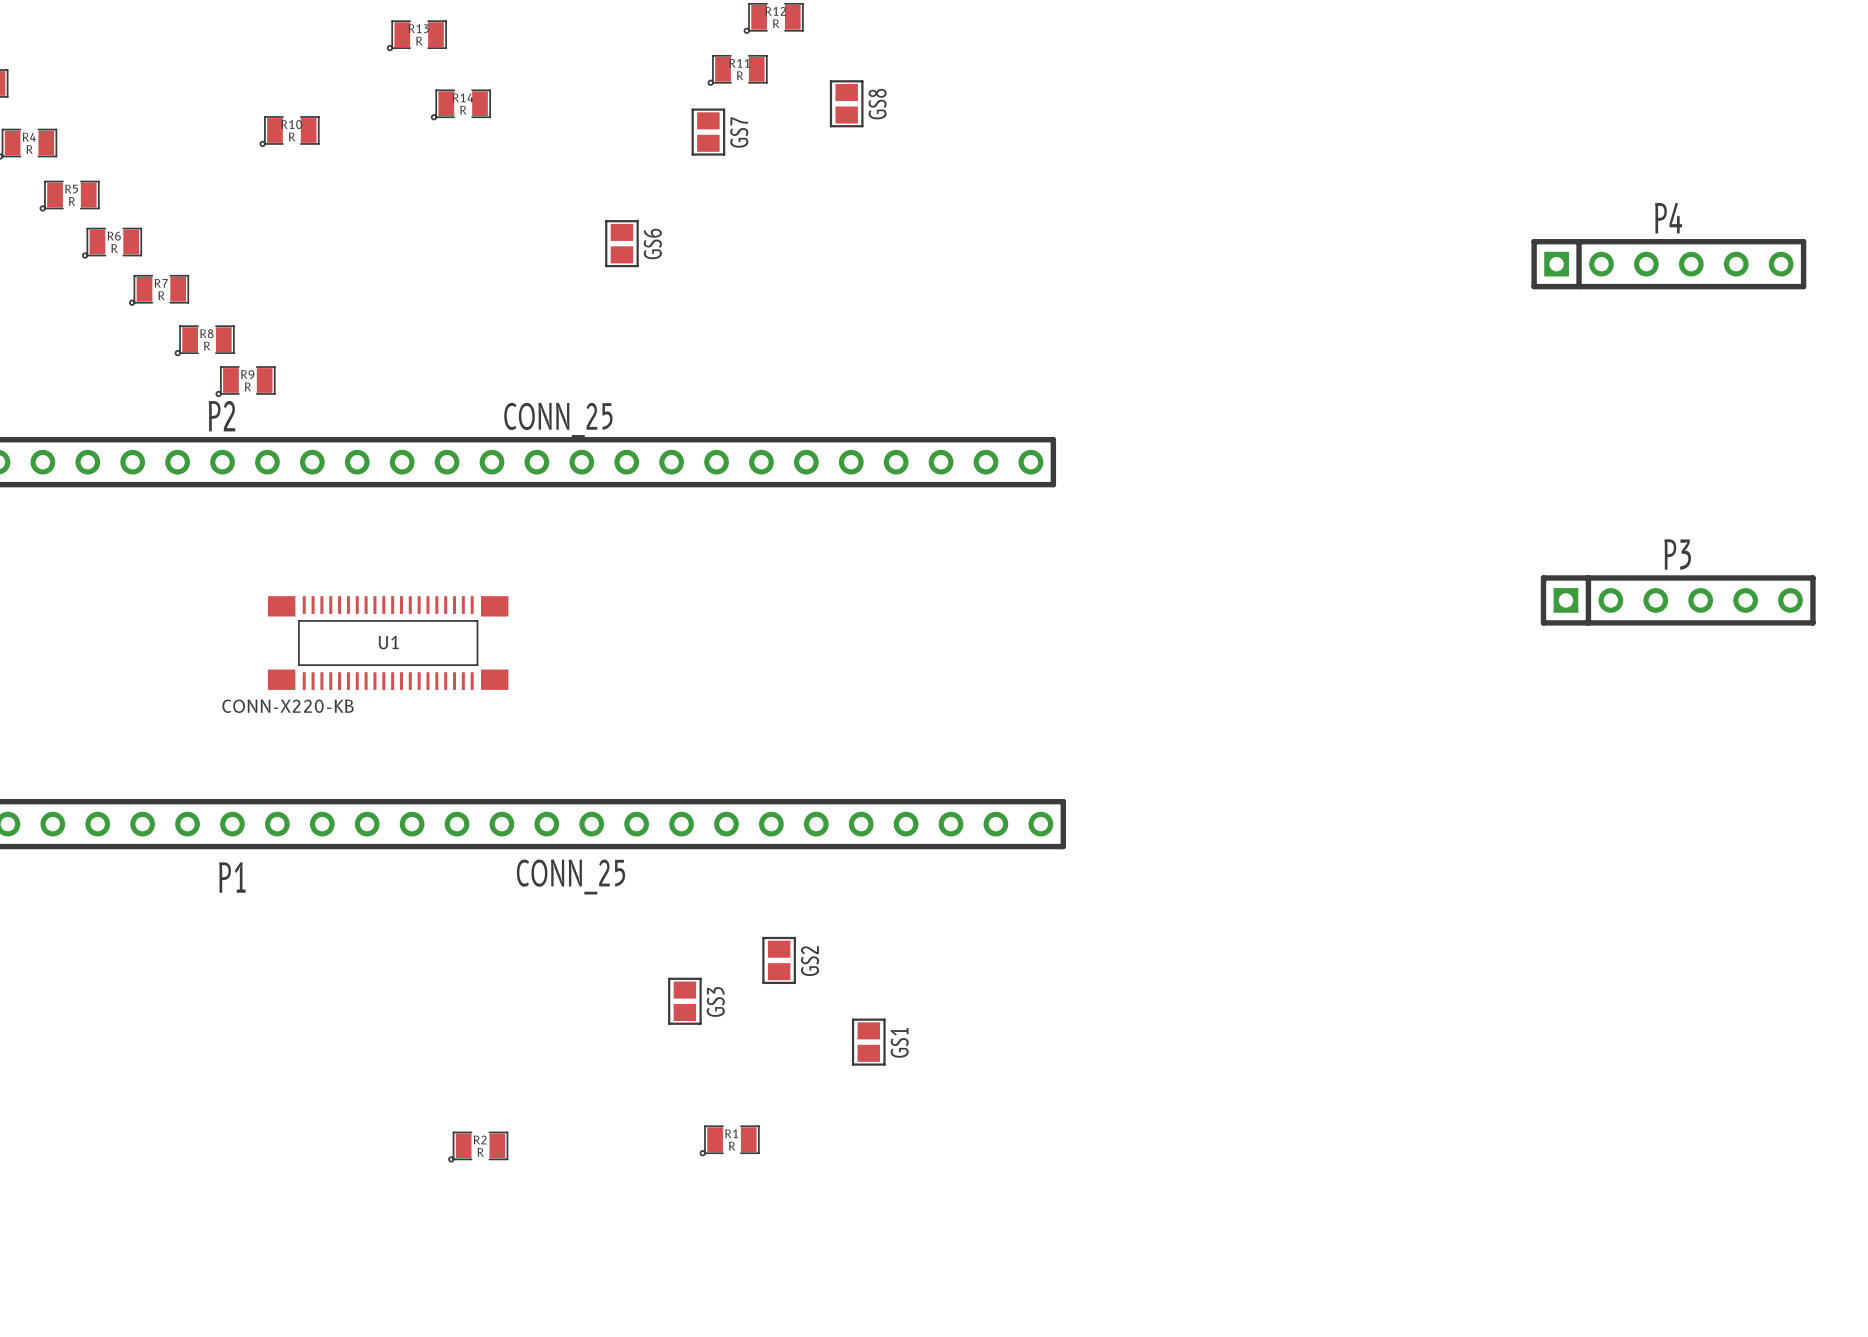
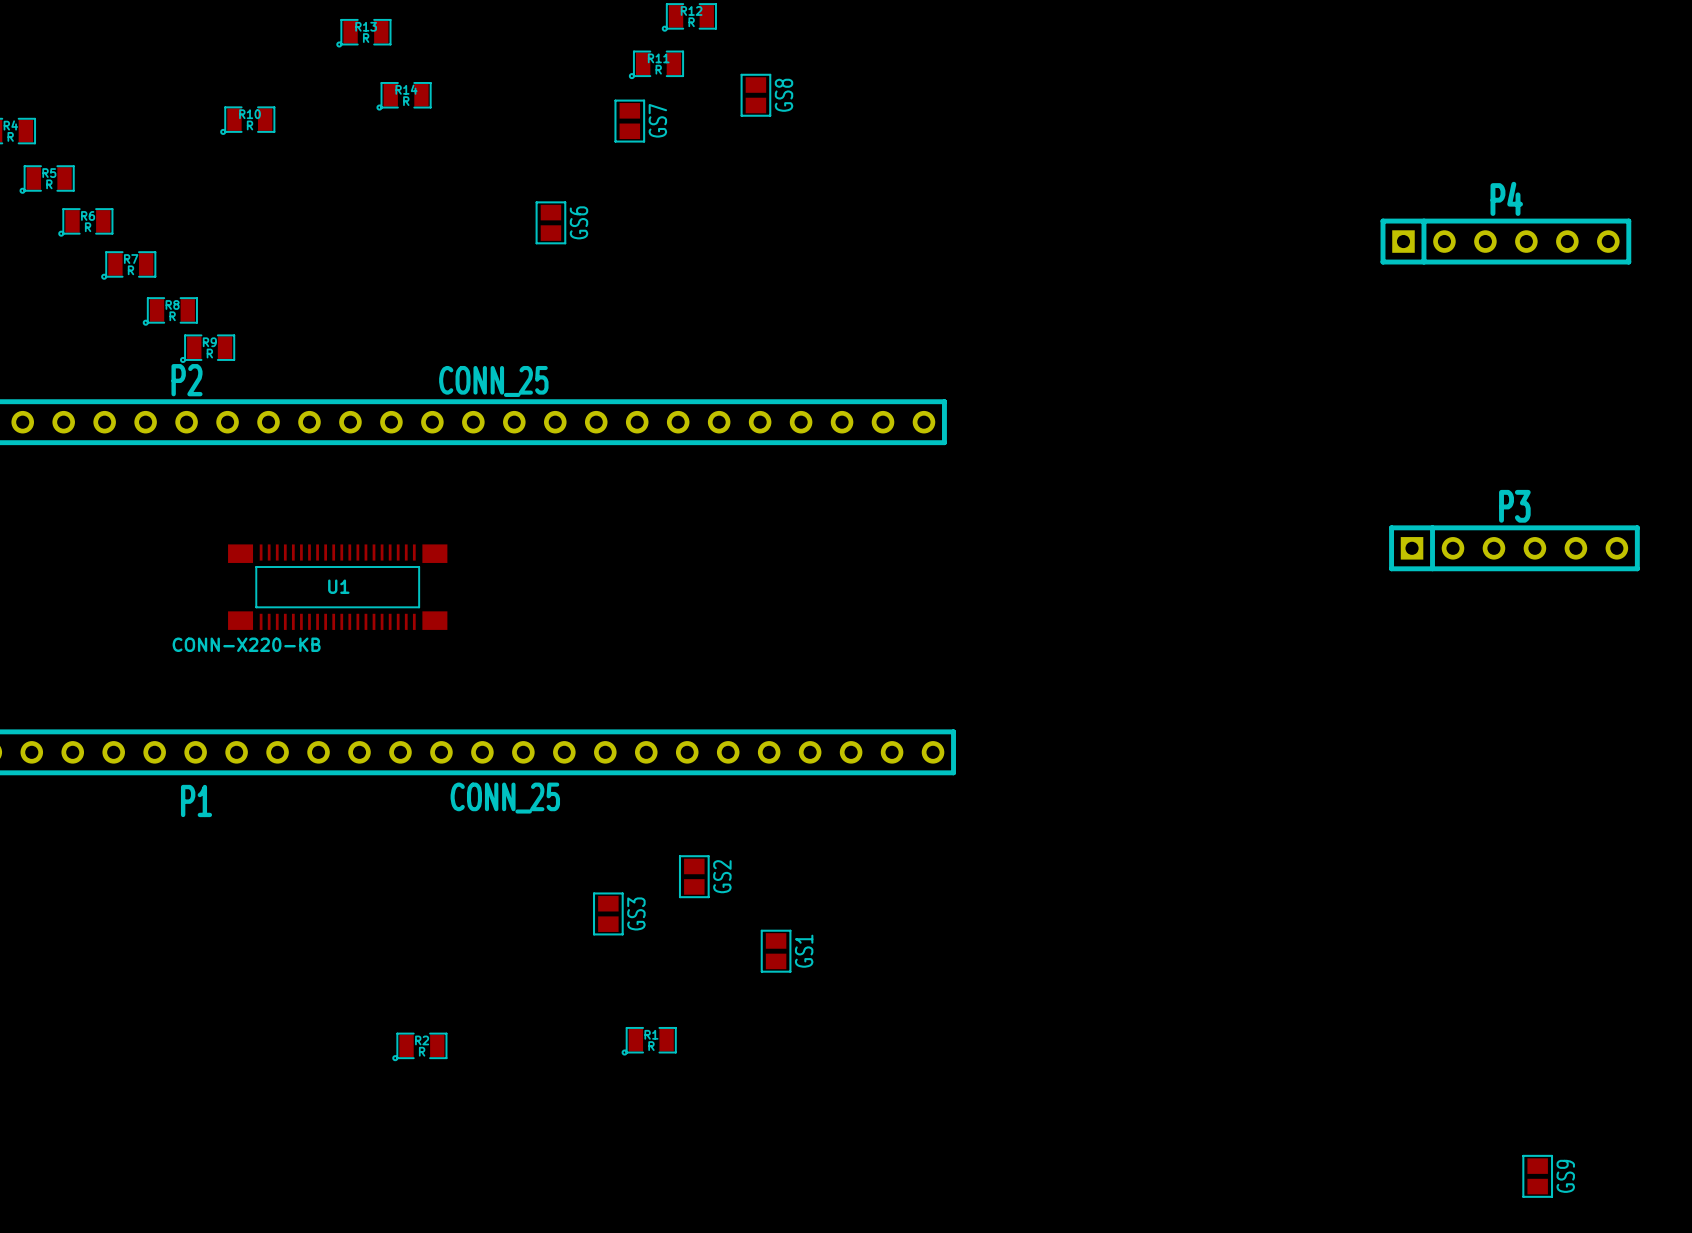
GS9: none -> (1537, 1176)

